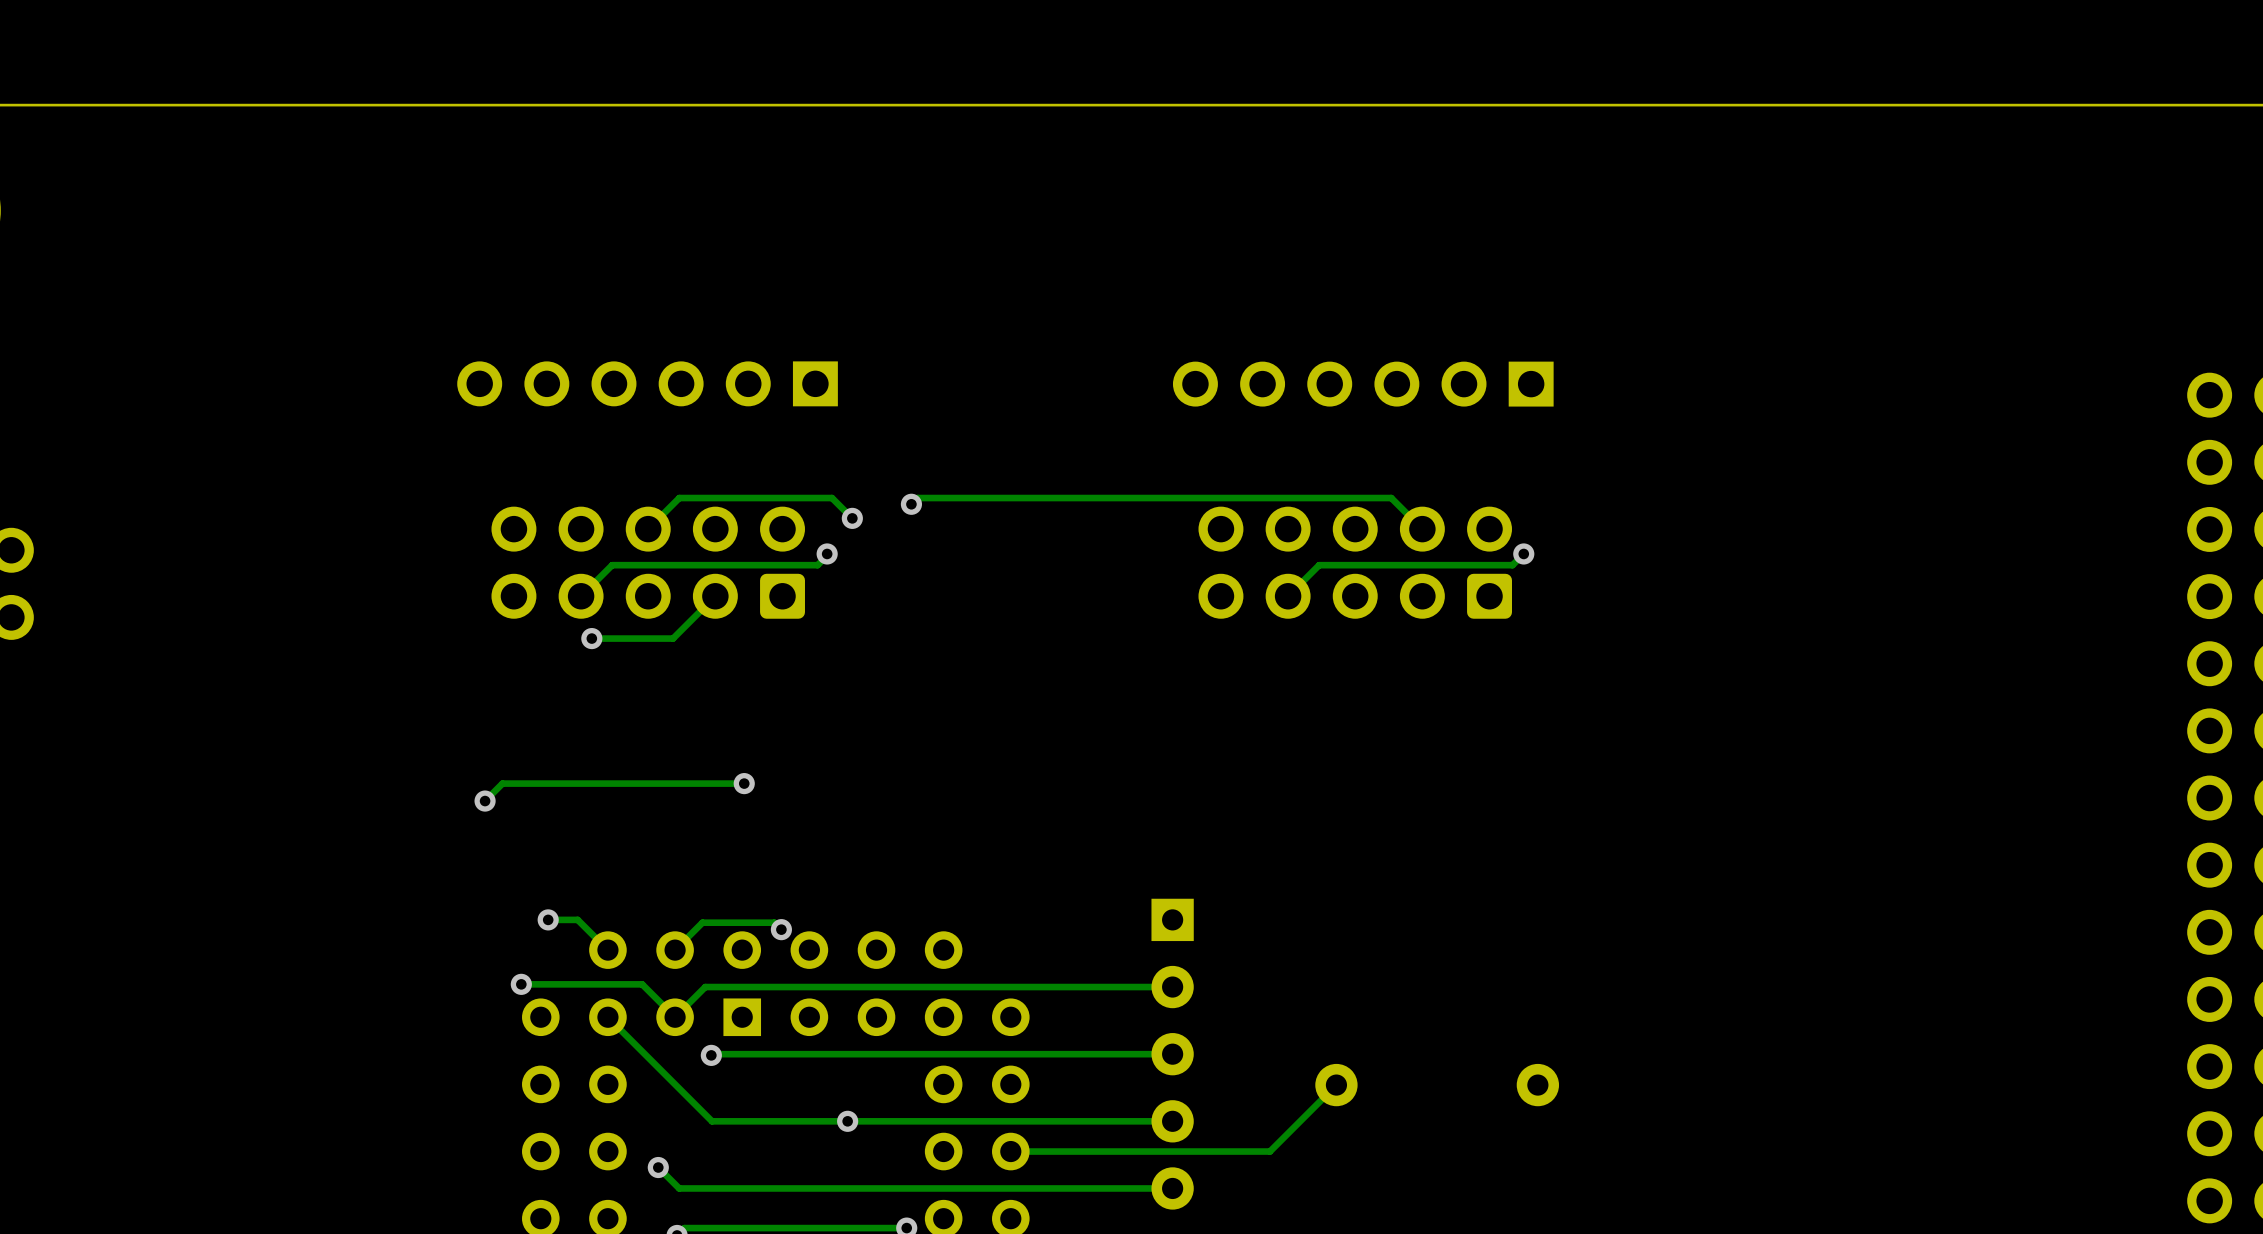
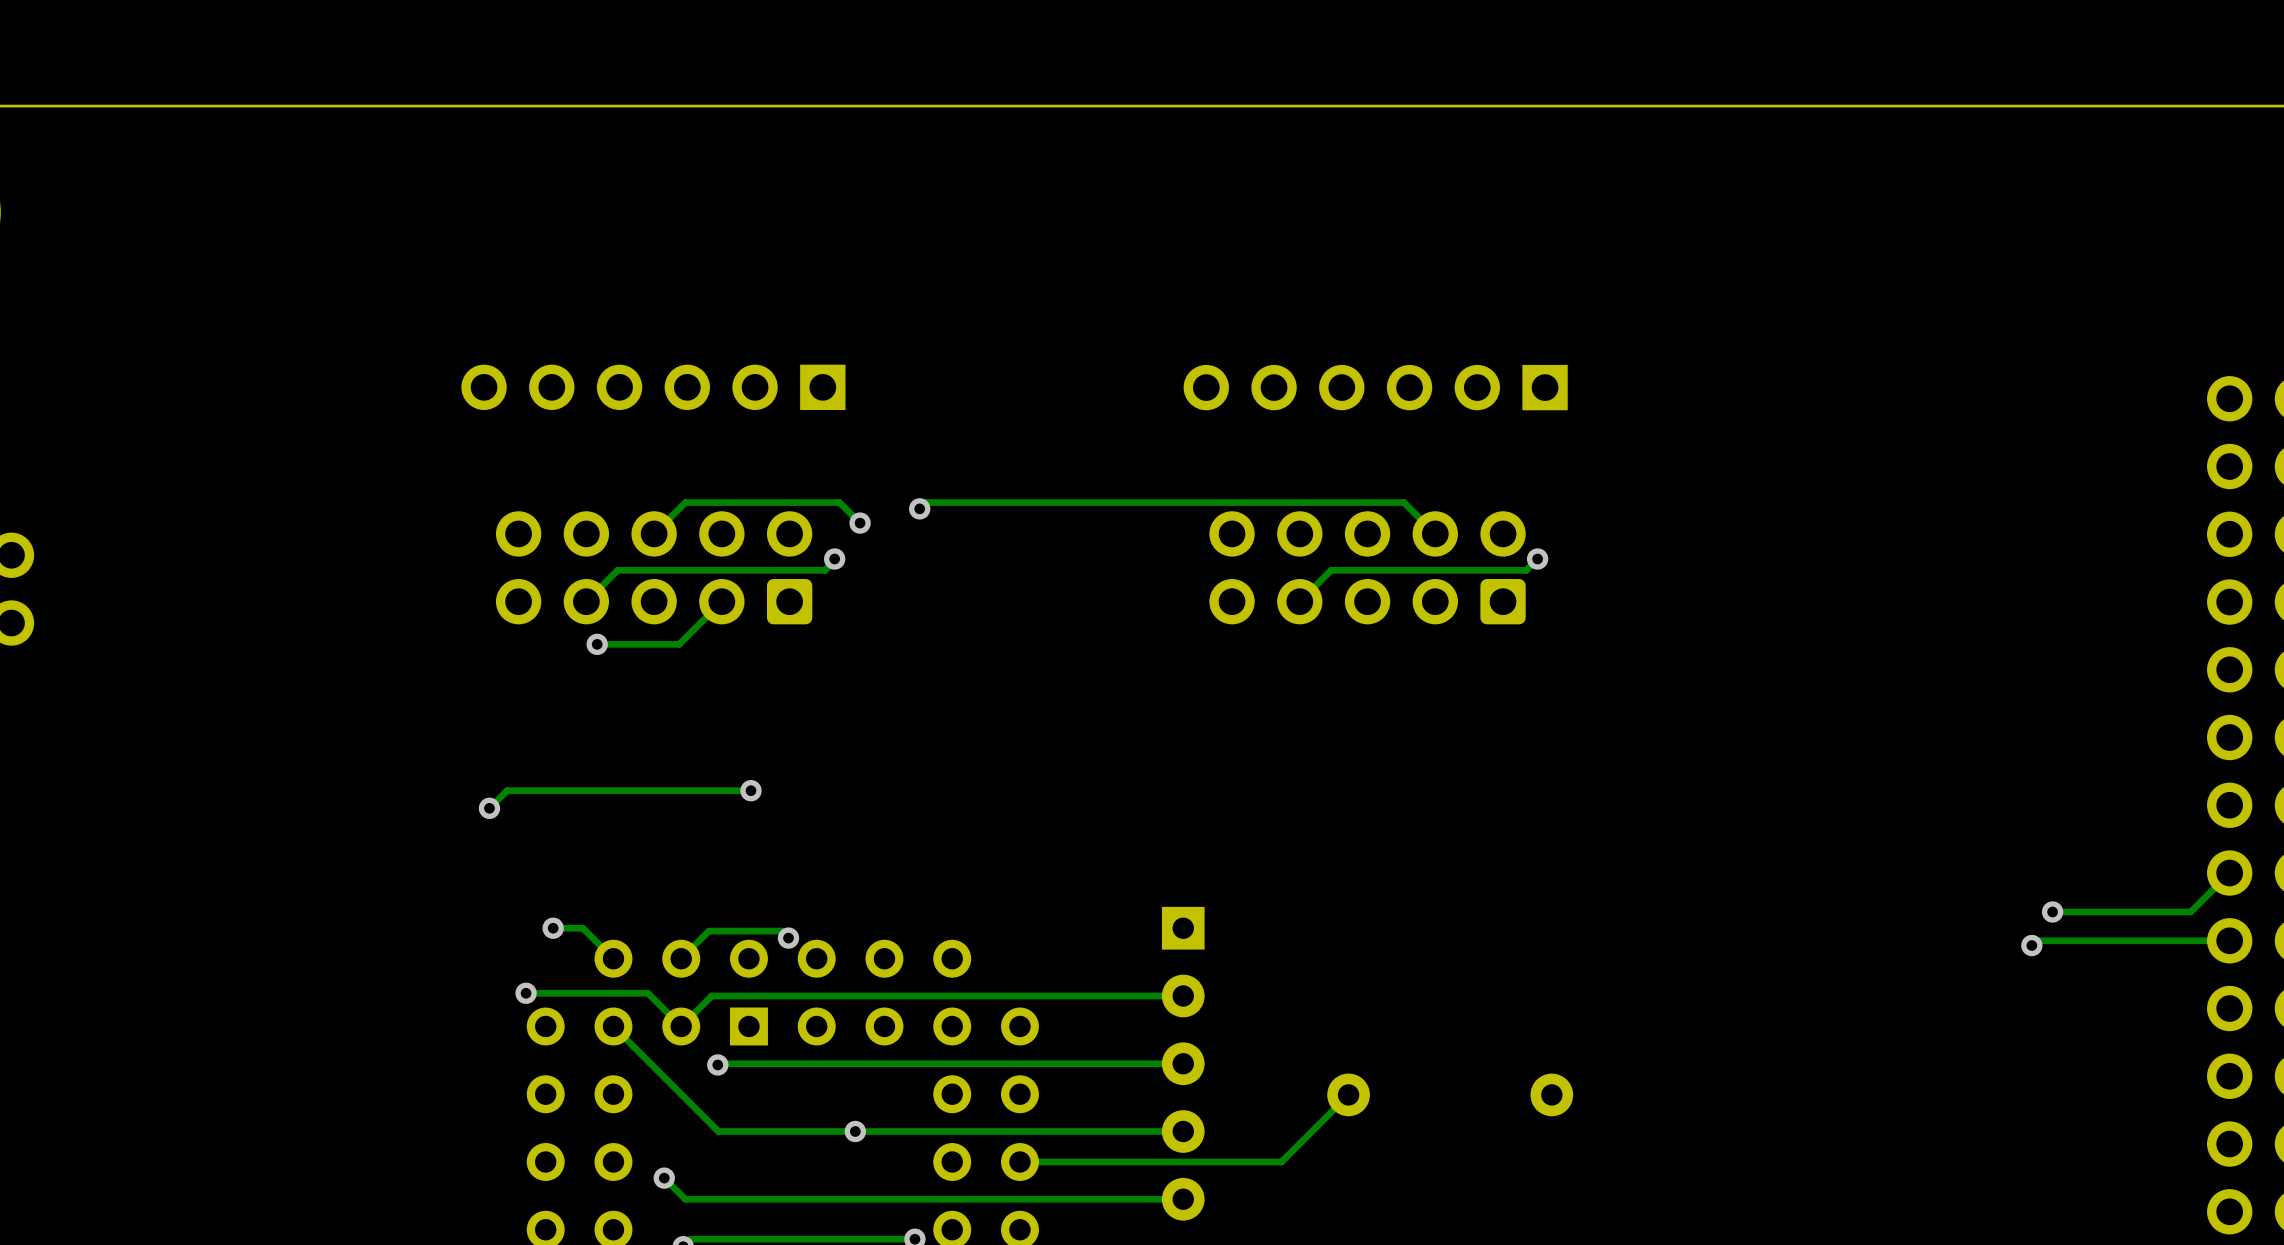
track: none -> (2229, 873) (2190, 911) (2052, 911)
via: none -> (2052, 911)
track: none -> (2229, 940) (2036, 940) (2031, 945)
via: none -> (2031, 945)

